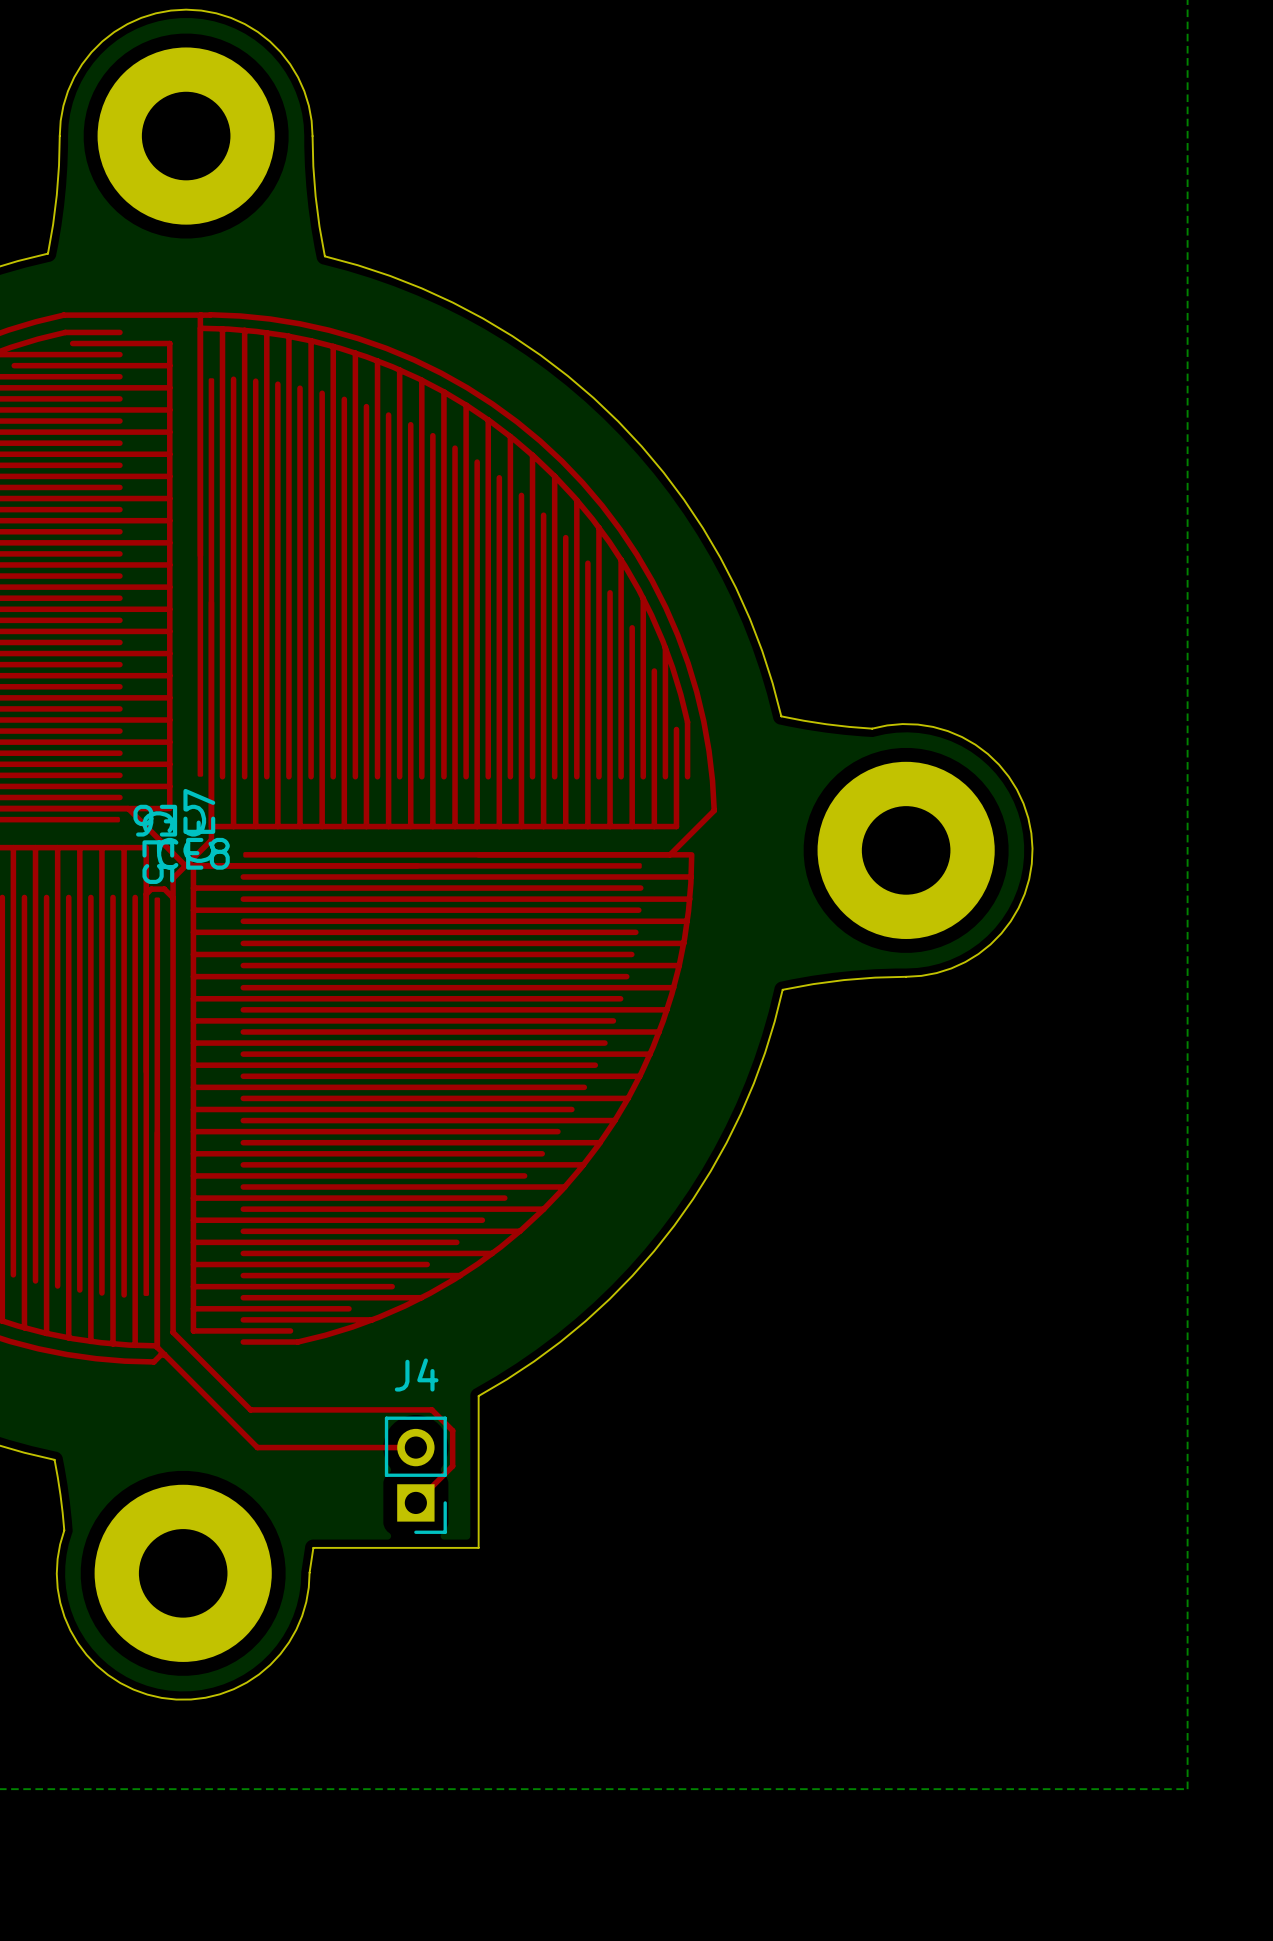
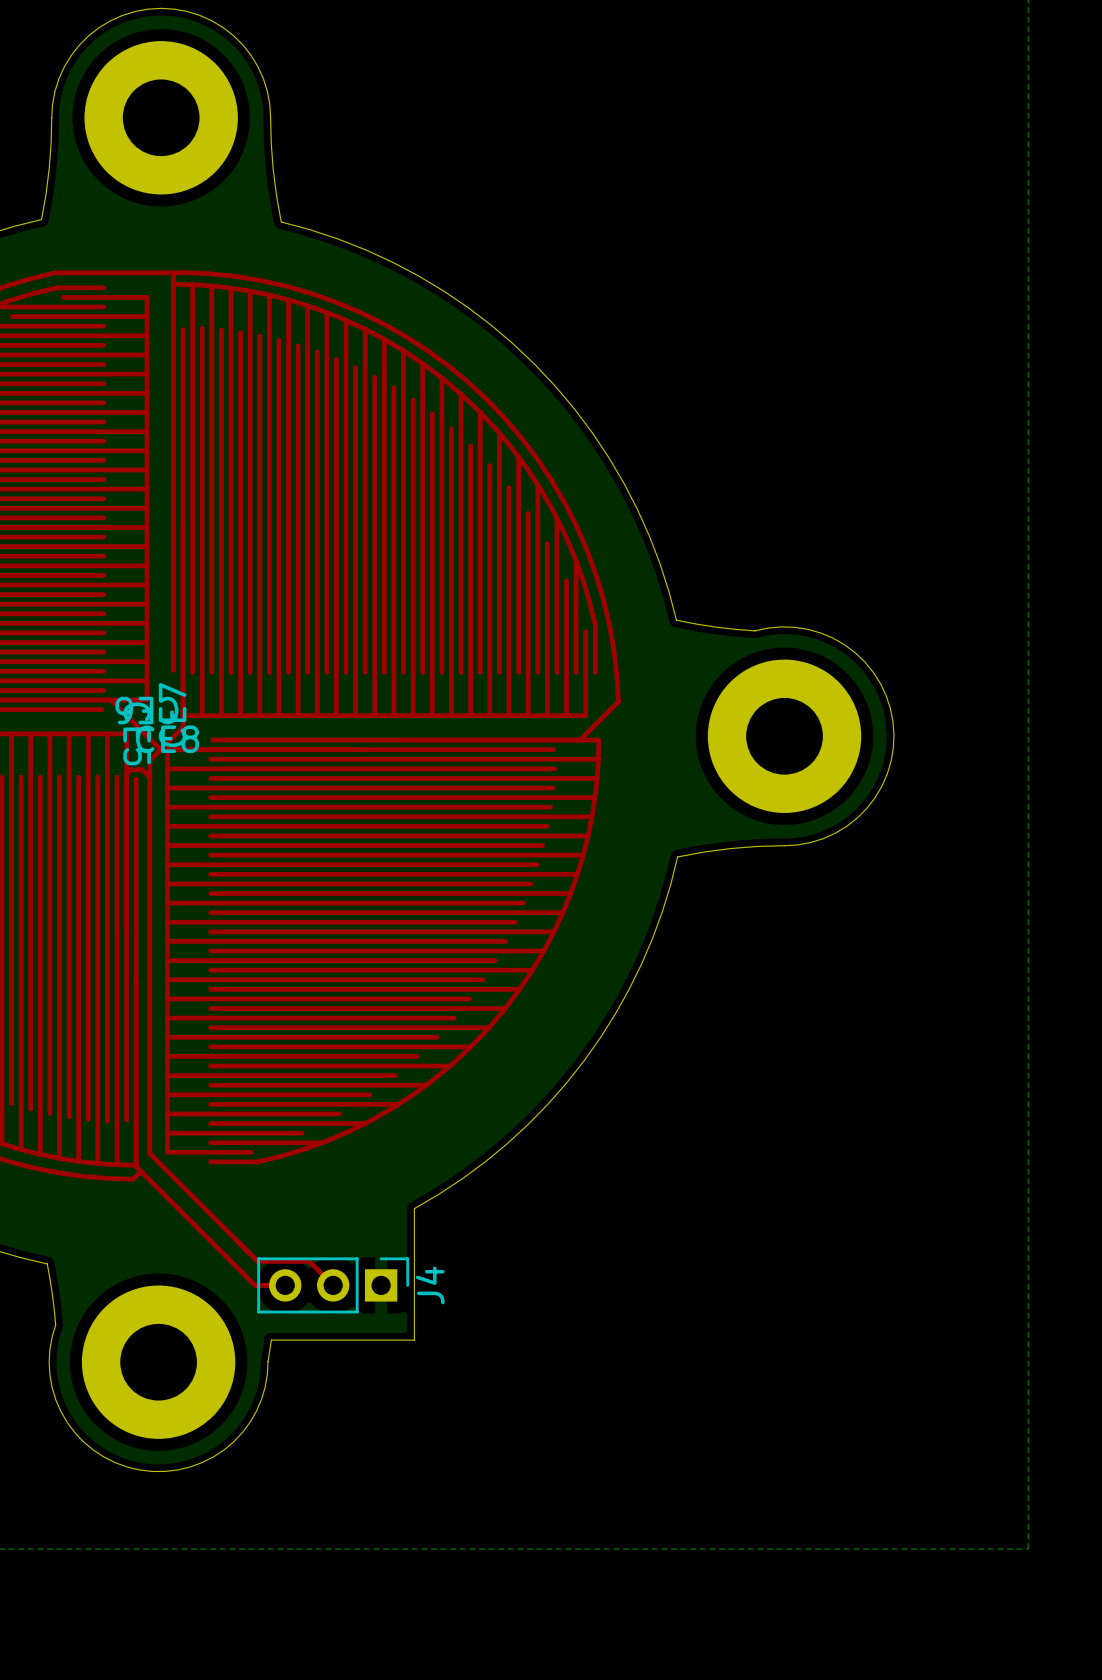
J4 name position: J4 (416, 1375) -> J4 (430, 1285)
top track: (250, 1409) (431, 1409) (452, 1430) (452, 1466) (415, 1502) -> (216, 1220) (257, 1261) (309, 1261) (333, 1285)
J4 footprint: [384, 1416, 447, 1534] -> [257, 1257, 410, 1314]
top track: (257, 1447) (415, 1447) -> (222, 1253) (255, 1285) (285, 1285)

